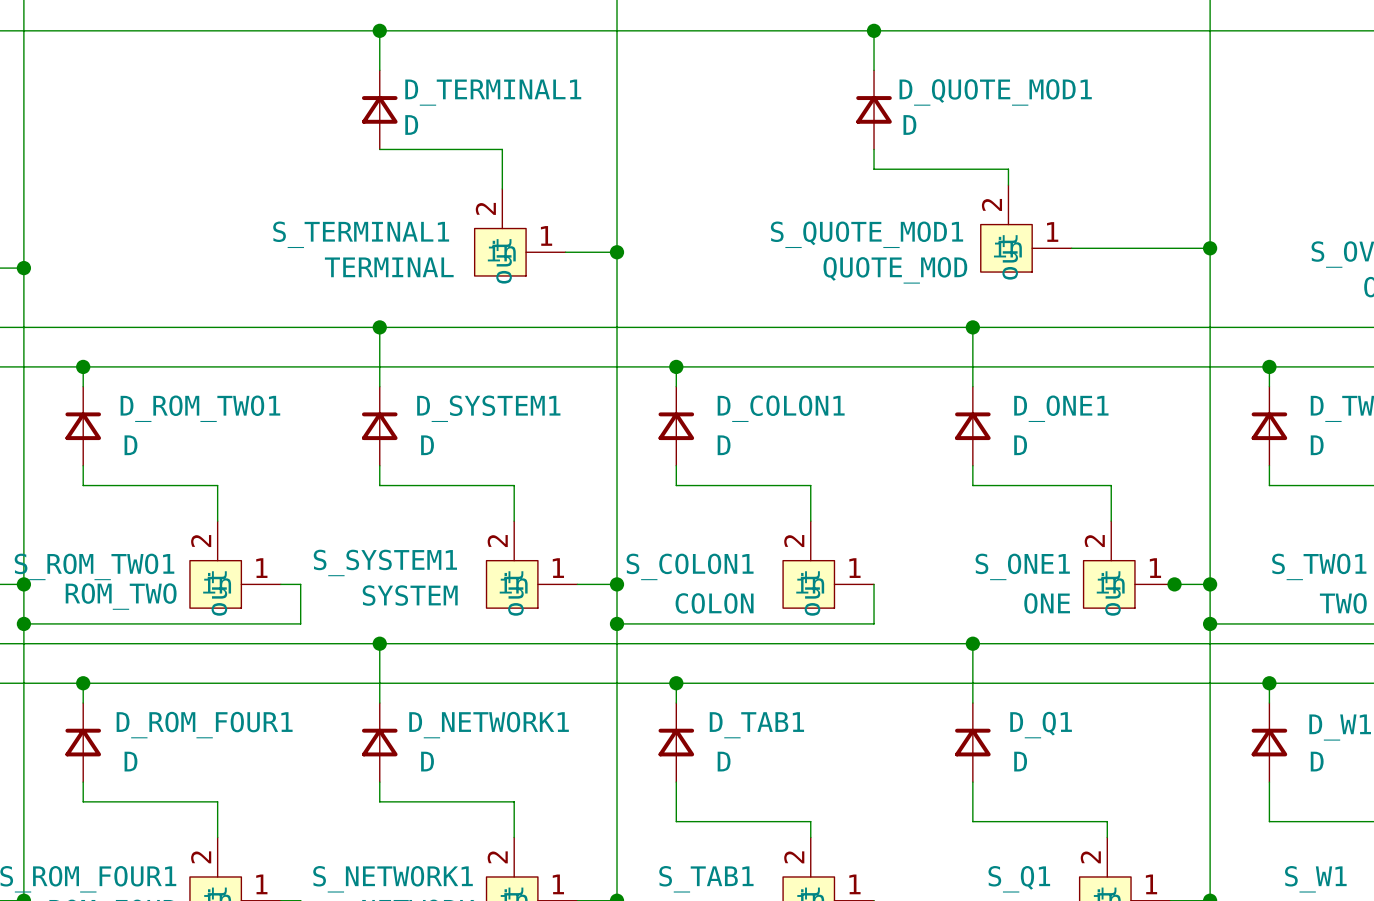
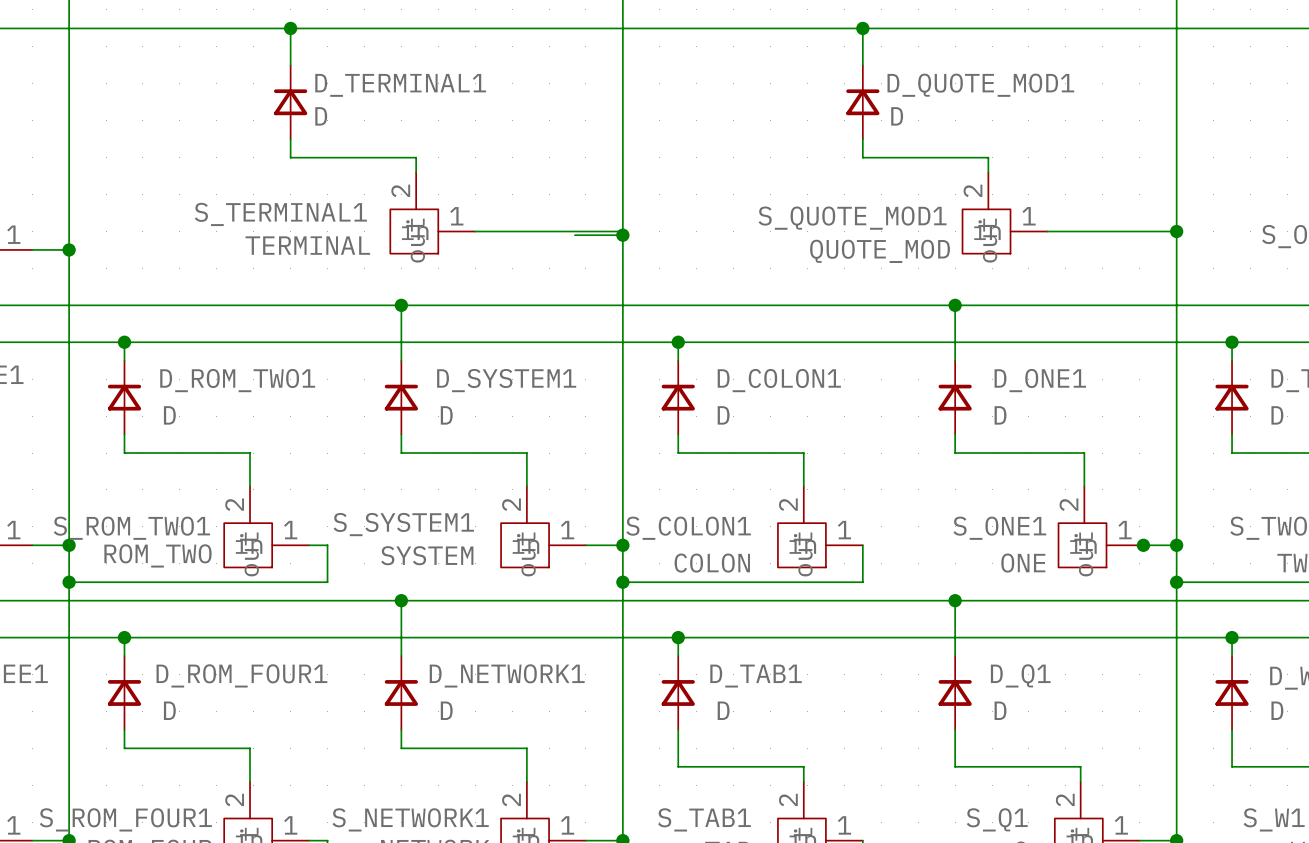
junction: none -> (290, 28)
wire: (379, 30) (379, 70) -> (290, 28) (290, 65)
junction: (379, 30) -> none
D_TERMINAL1 position: (379, 109) -> (290, 102)
wire: none -> (290, 139) (290, 157) (416, 157) (416, 172)
wire: (379, 149) (502, 149) (502, 189) -> none
S_TERMINAL1 position: (520, 232) -> (432, 213)
wire: none -> (475, 231) (622, 231)

